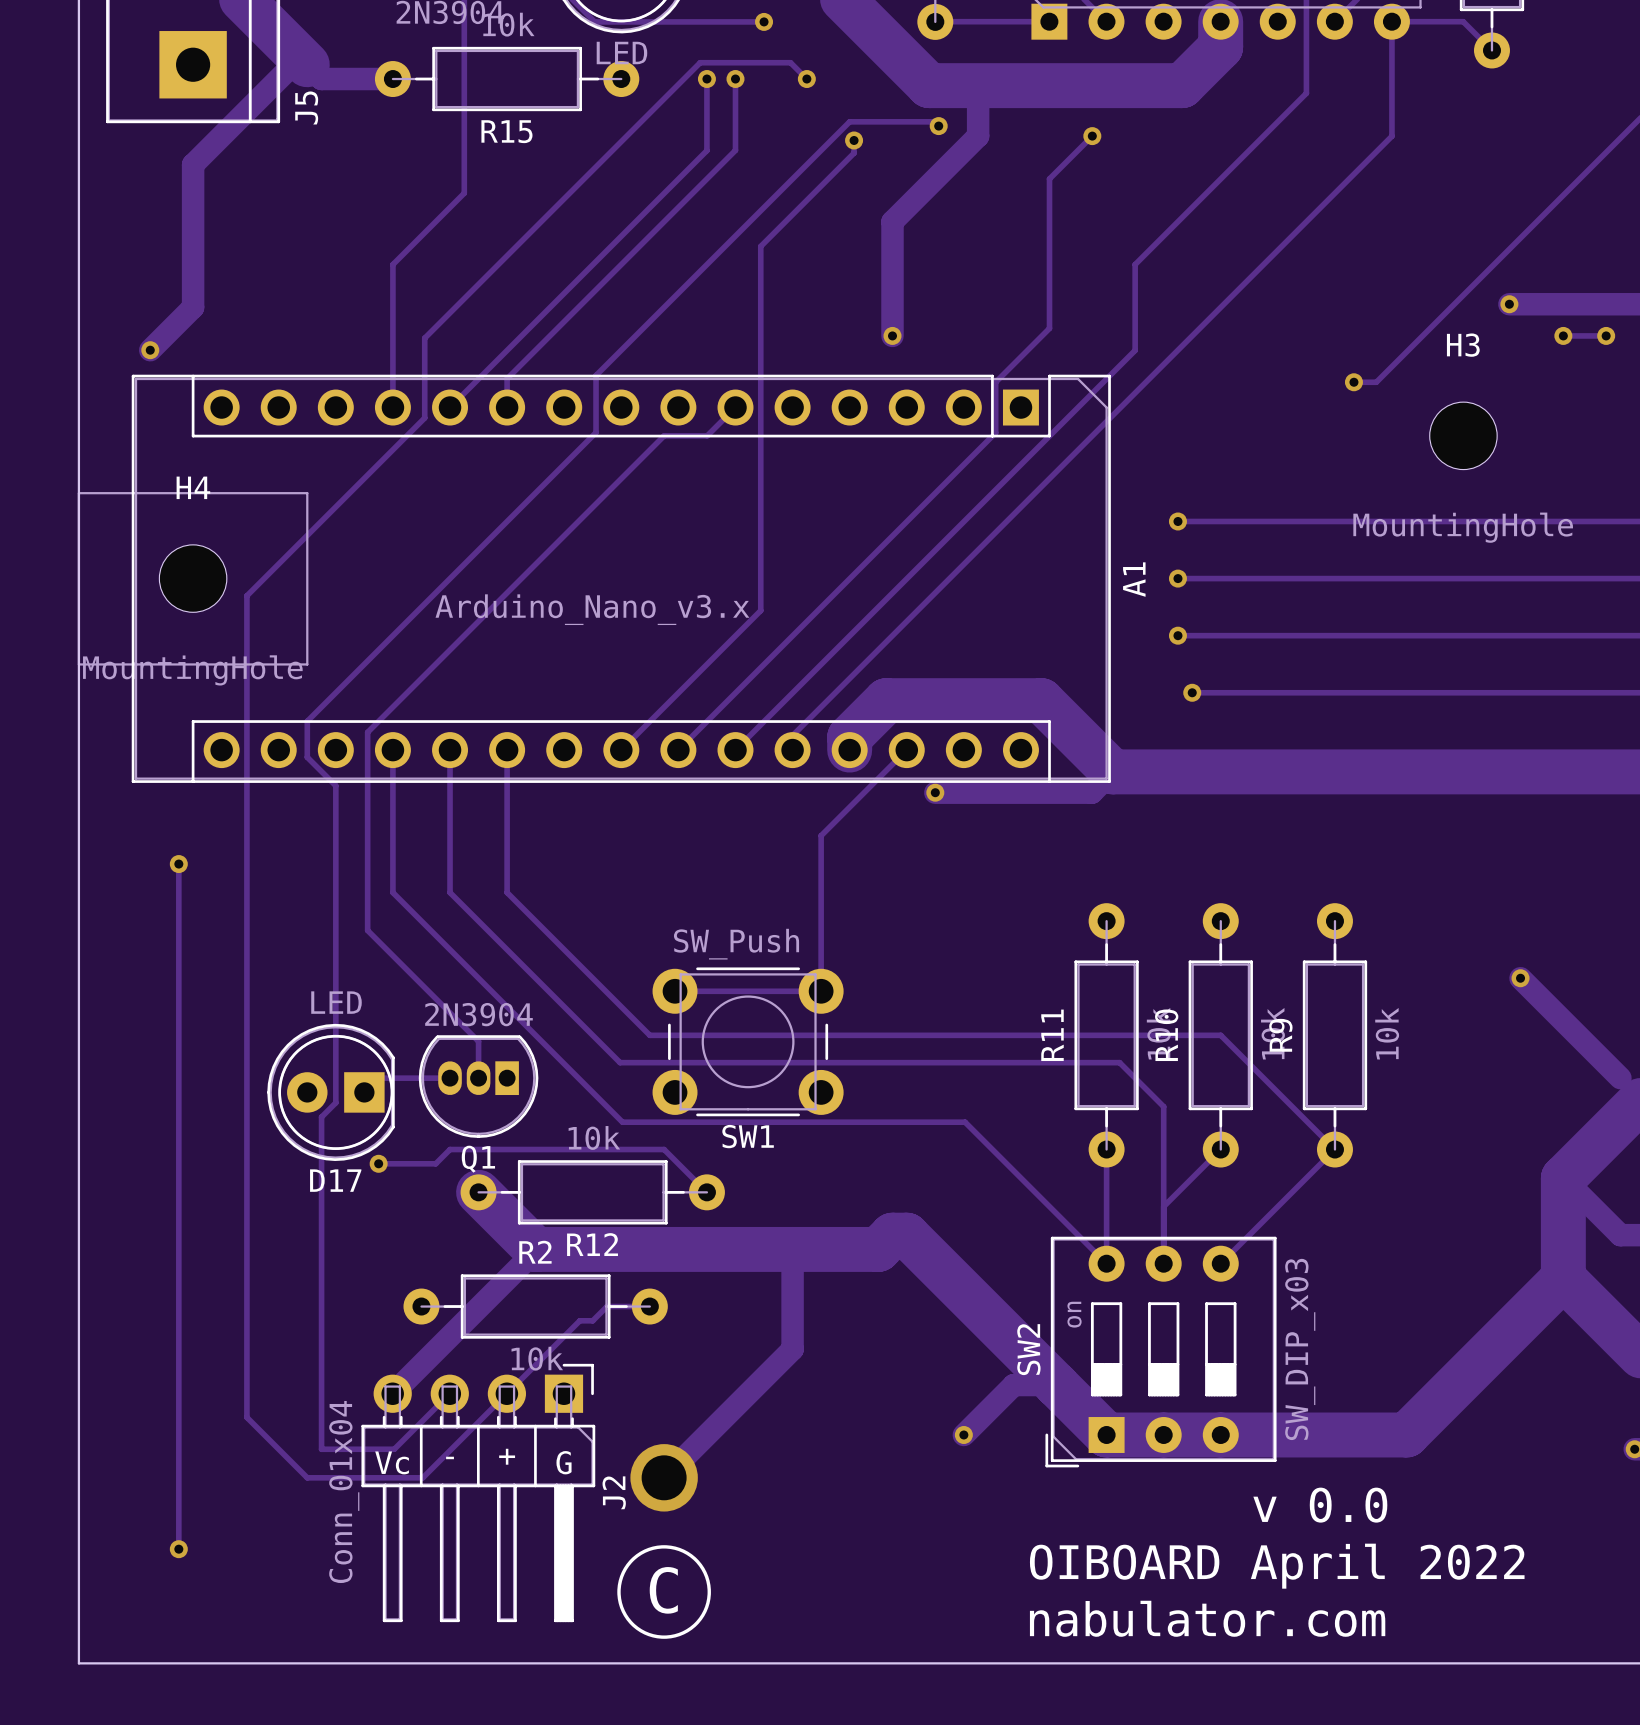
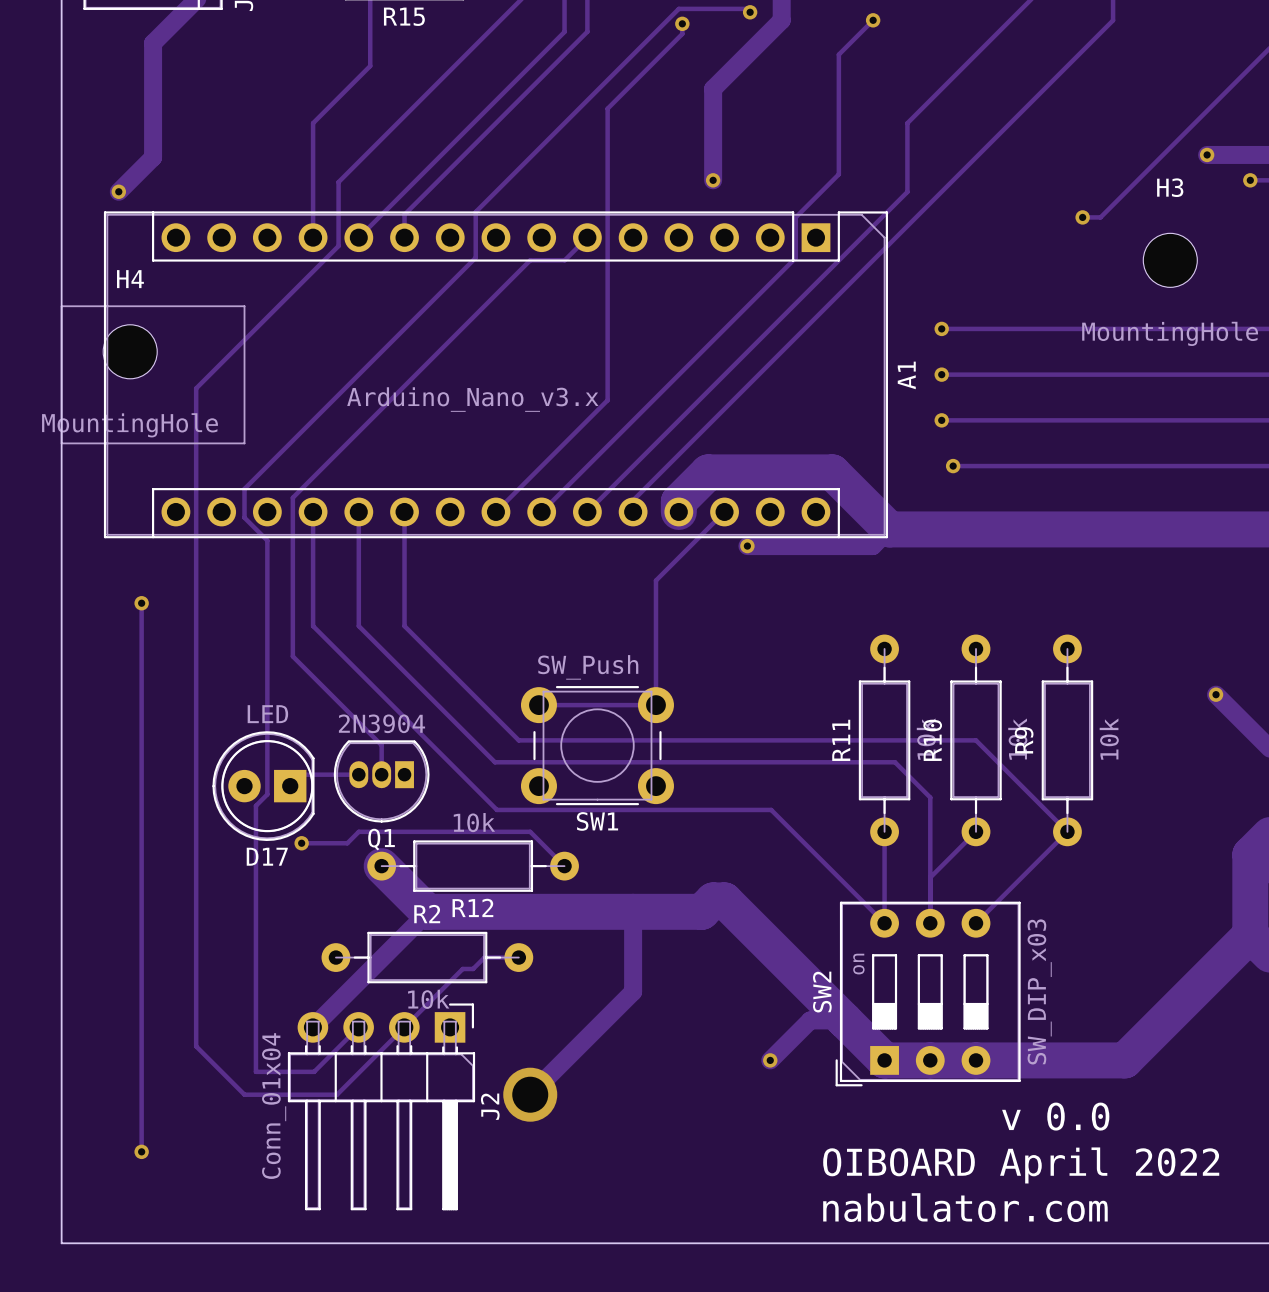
H4 position: (193, 578) -> (130, 351)
text: + (507, 1456) -> none
text: - (450, 1457) -> none
text: Vc (392, 1462) -> none
text: G (564, 1462) -> none
drawing: [617, 1545, 711, 1639] -> none
text: C (663, 1590) -> none

